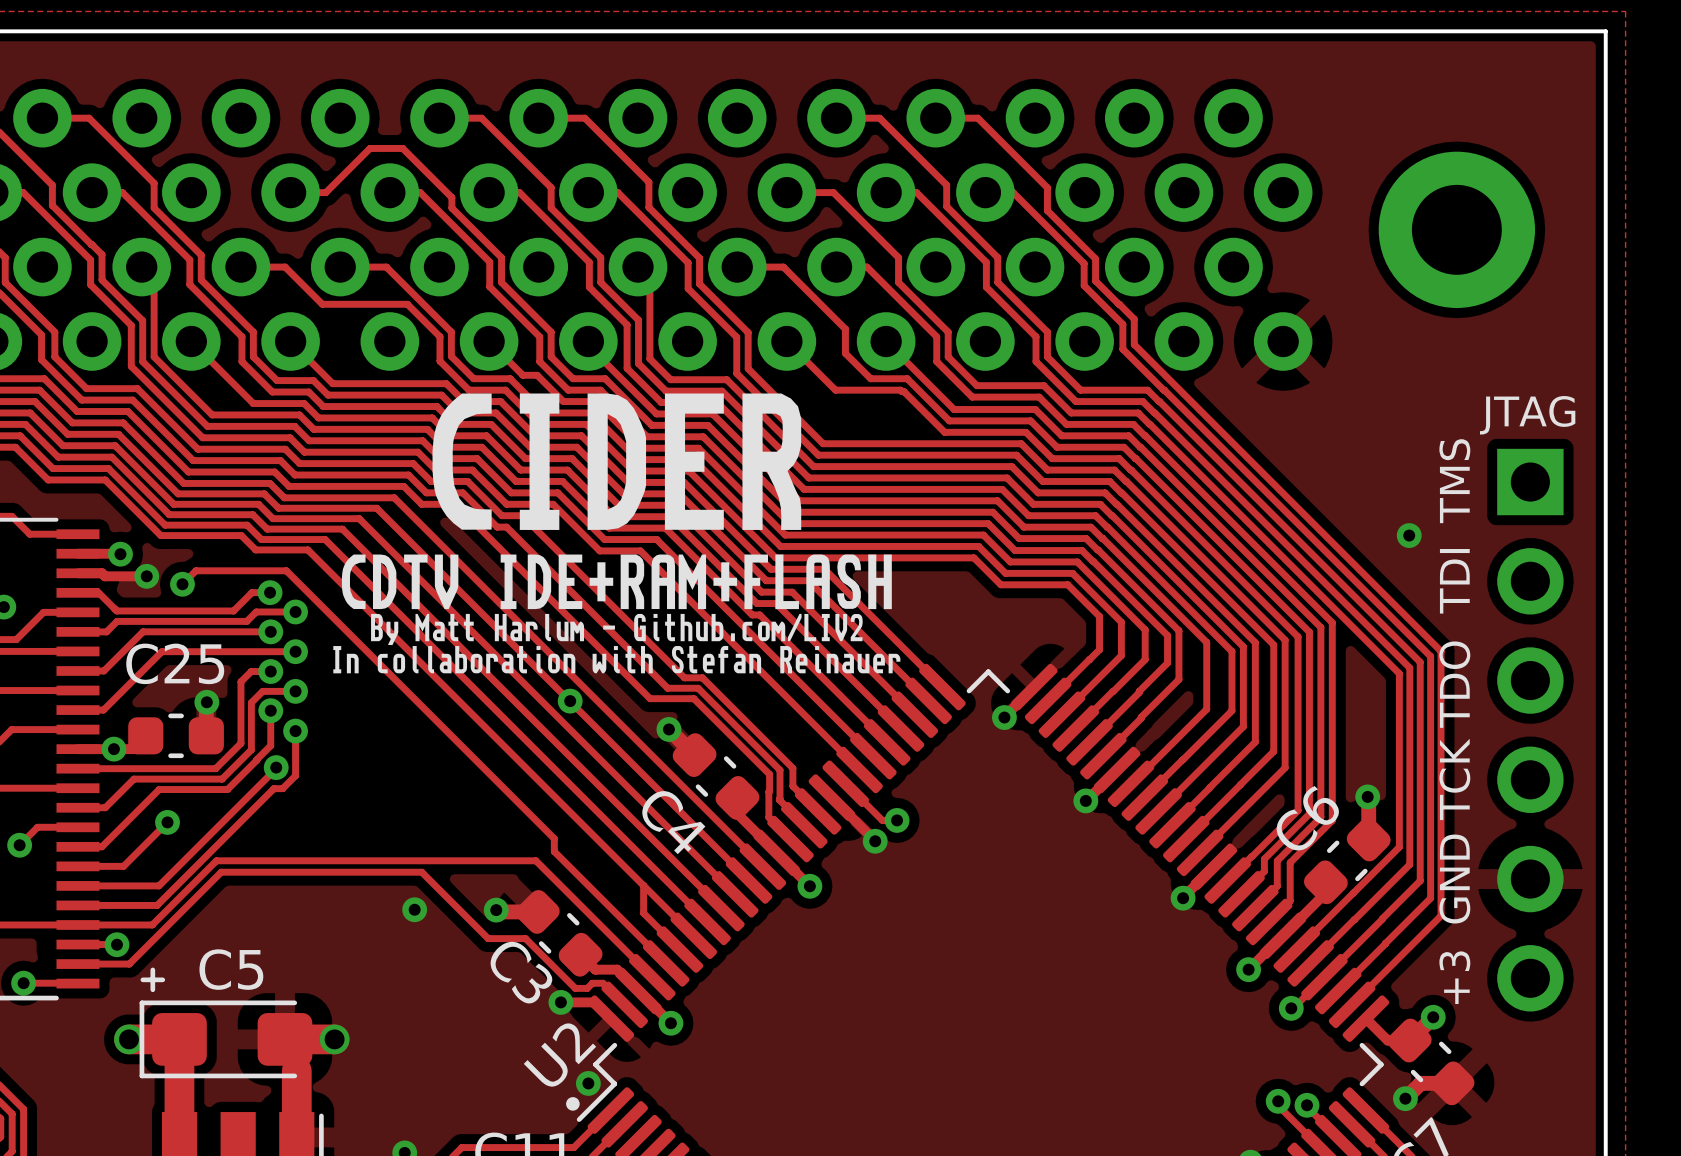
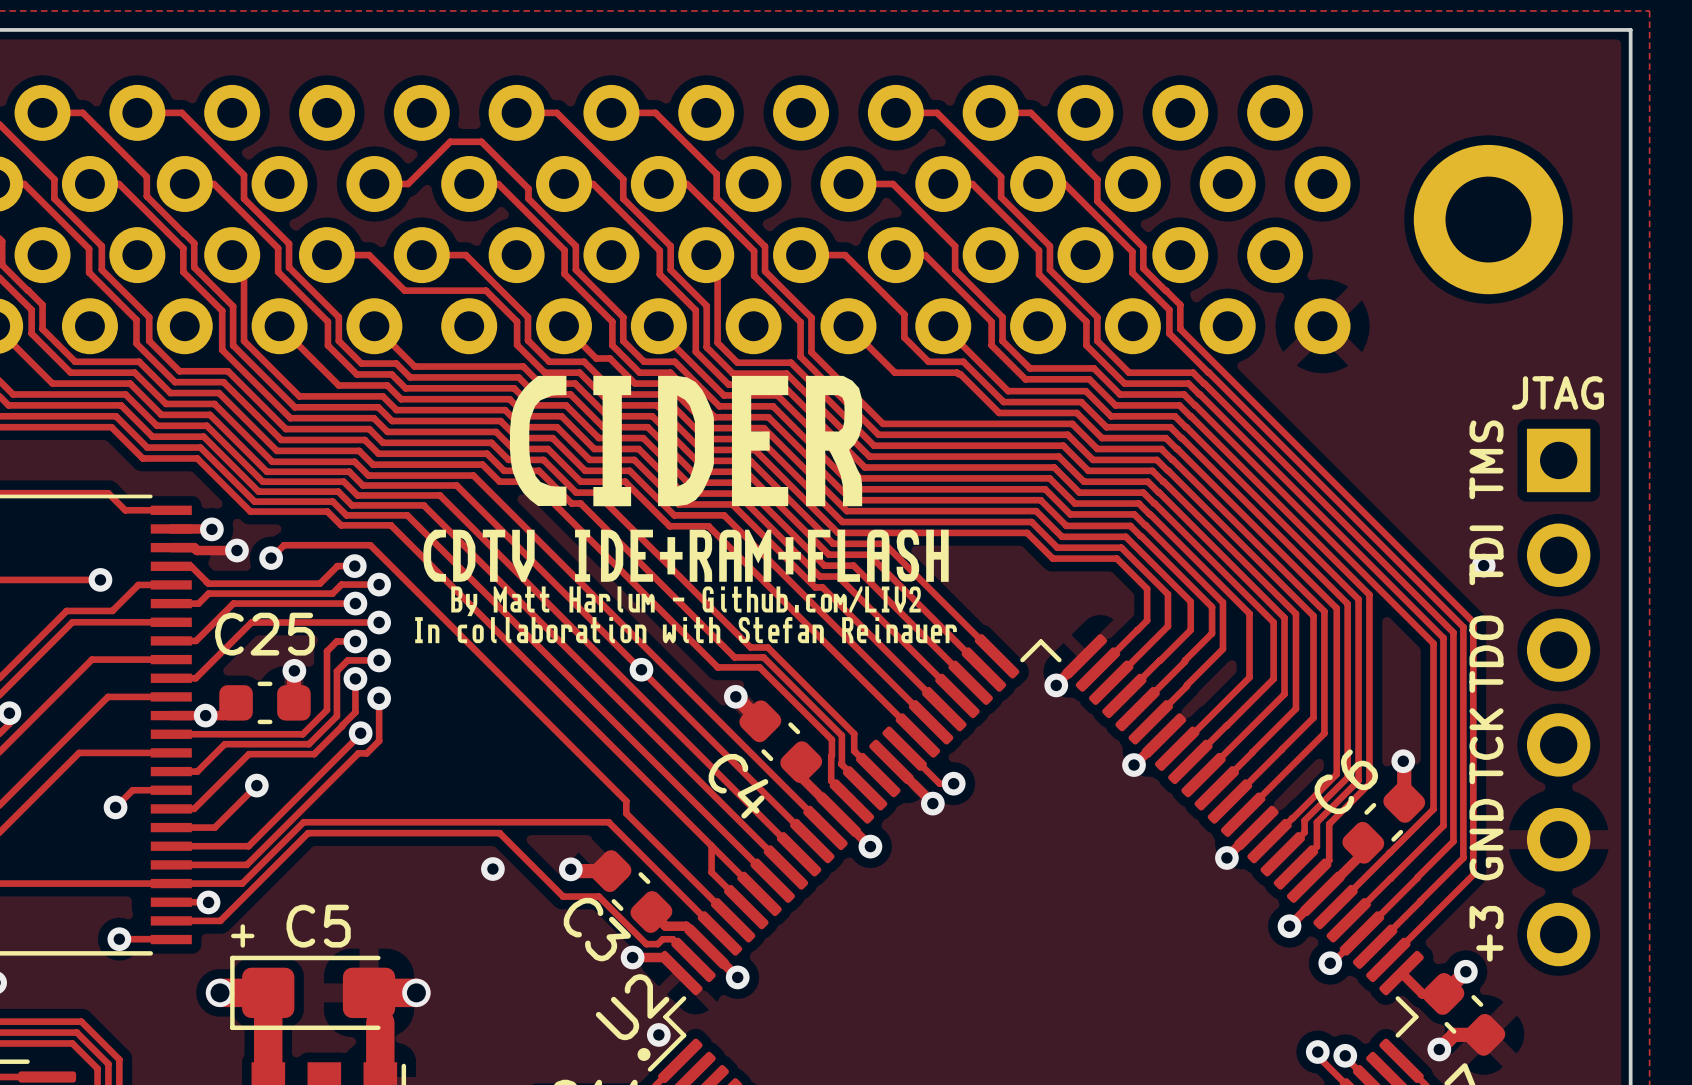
via position: (1409, 535) -> (1483, 565)

